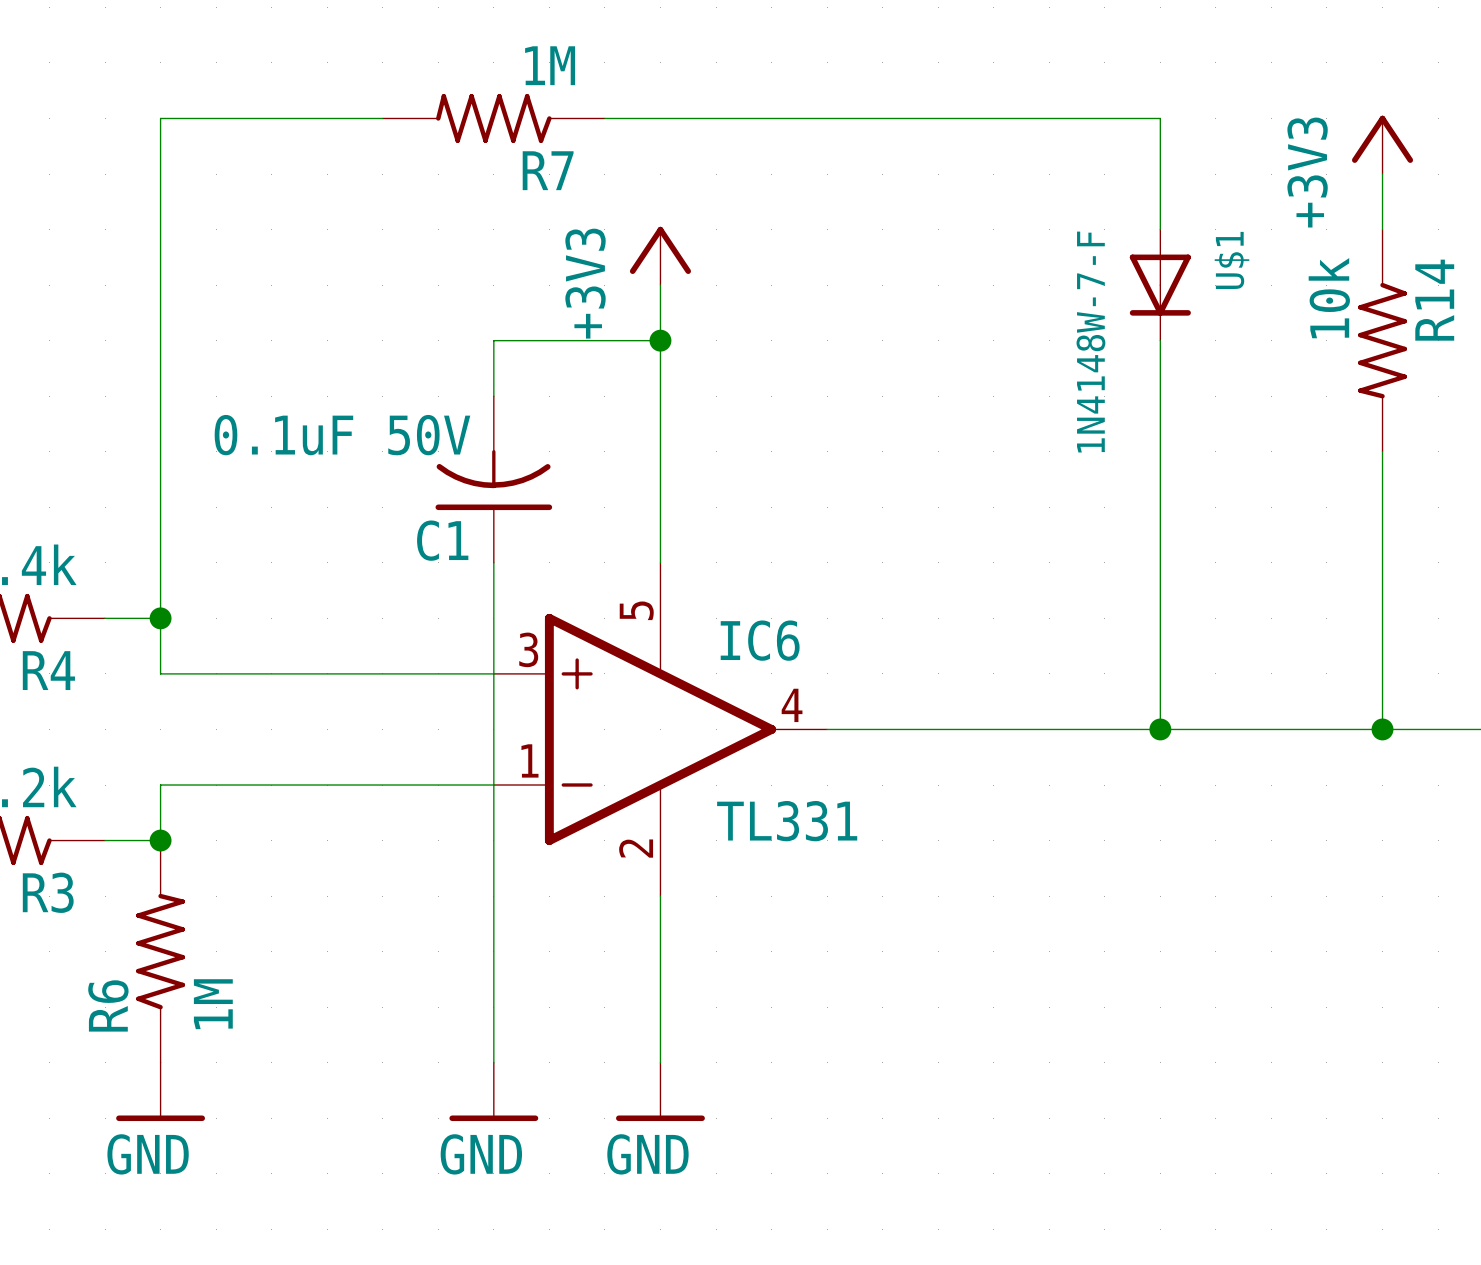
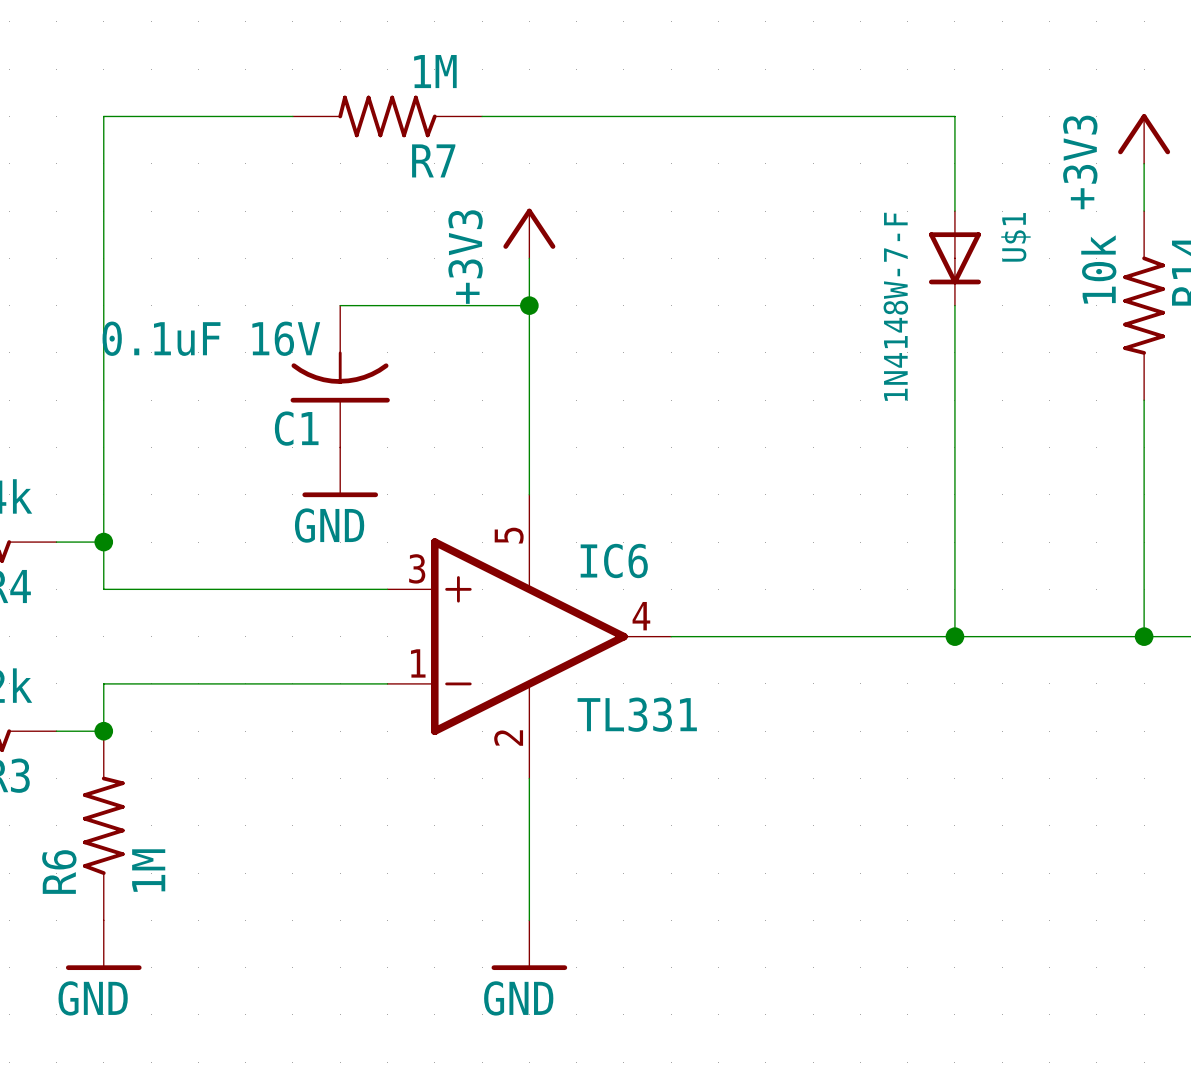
wire: (493, 340) (493, 396) -> (387, 305) (340, 305)
C1 value: 0.1uF 50V (342, 435) -> 0.1uF 16V (211, 338)
C1 position: (493, 479) -> (340, 376)
power symbol: none -> GND (340, 472)
wire: (493, 562) (493, 1062) -> none
power symbol: GND (493, 1091) -> none

